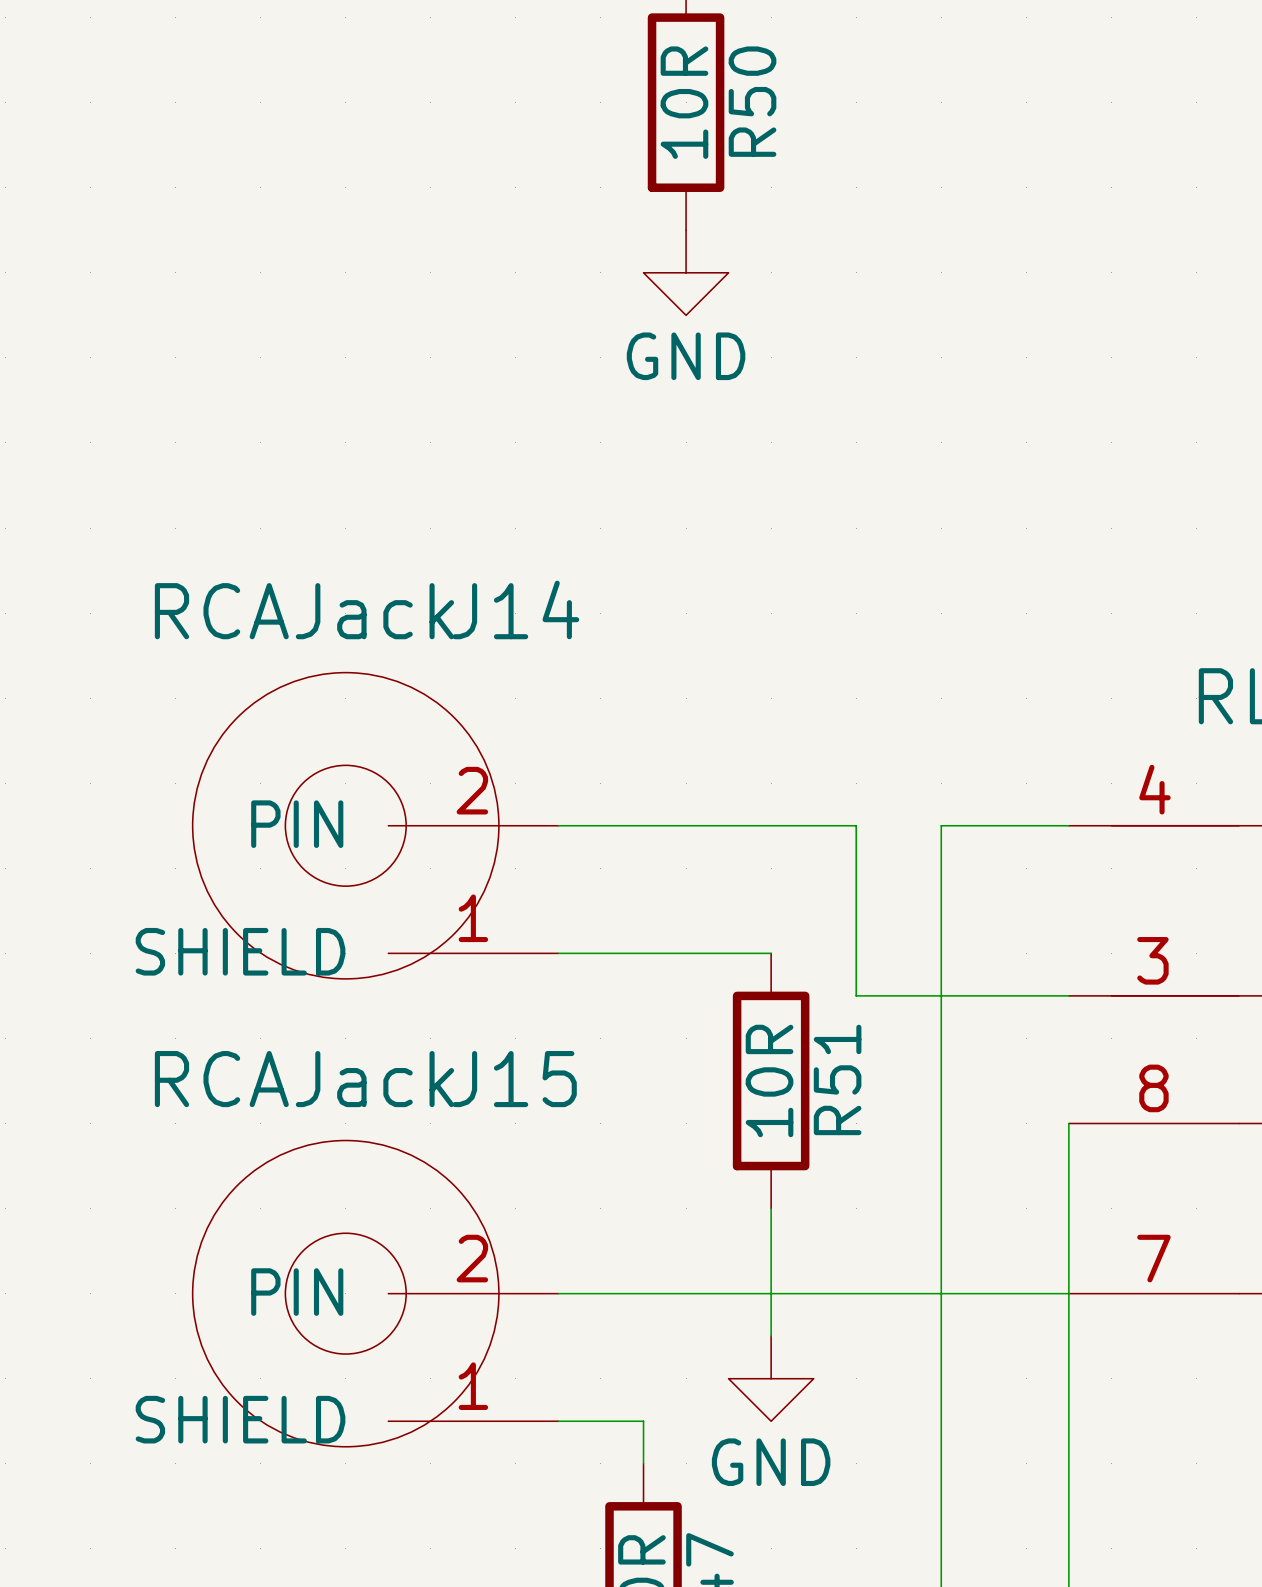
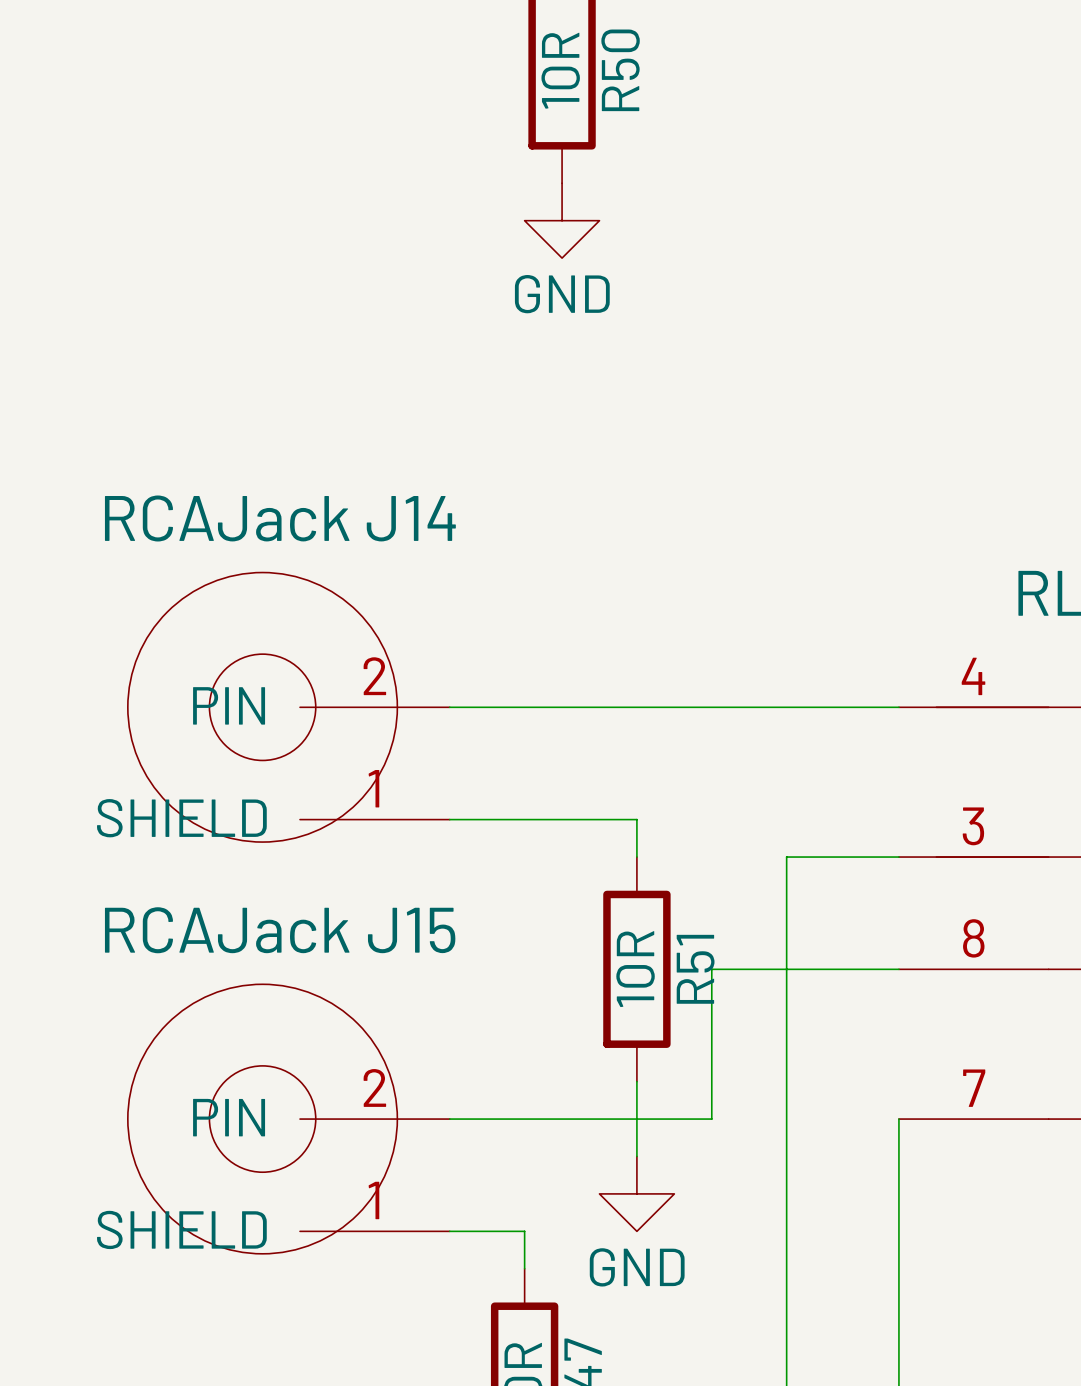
wire: (856, 825) (856, 995) (941, 995) (941, 825) -> (711, 707) (786, 707)
R51 position: (771, 1080) -> (636, 969)
wire: (1068, 1123) (1068, 1293) (856, 1293) -> (898, 969) (711, 969) (711, 1119)

